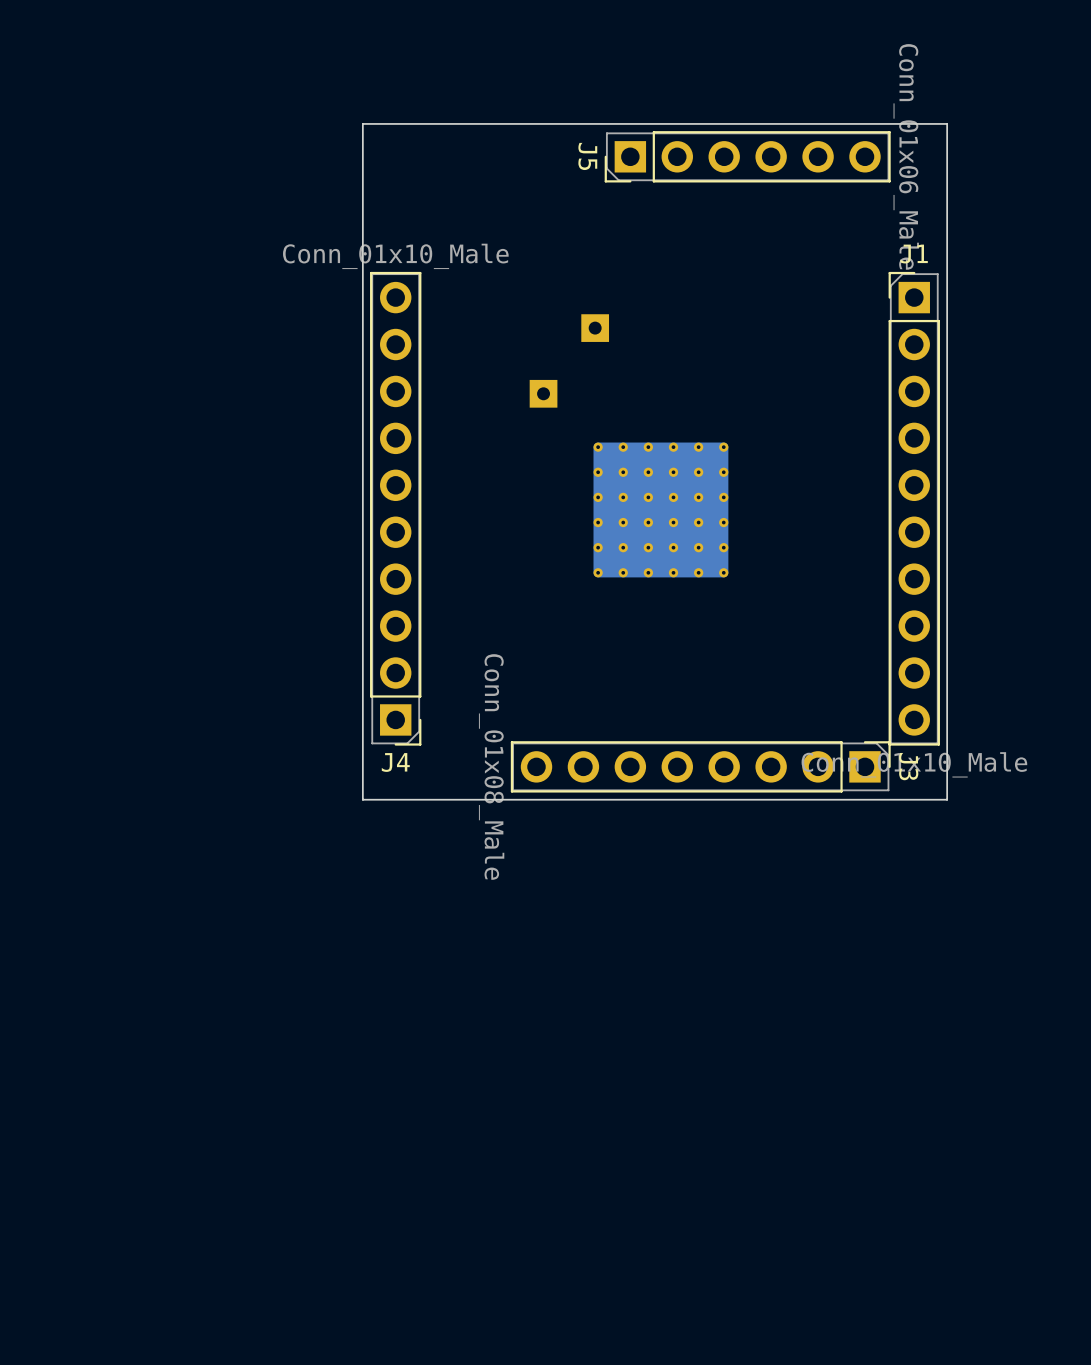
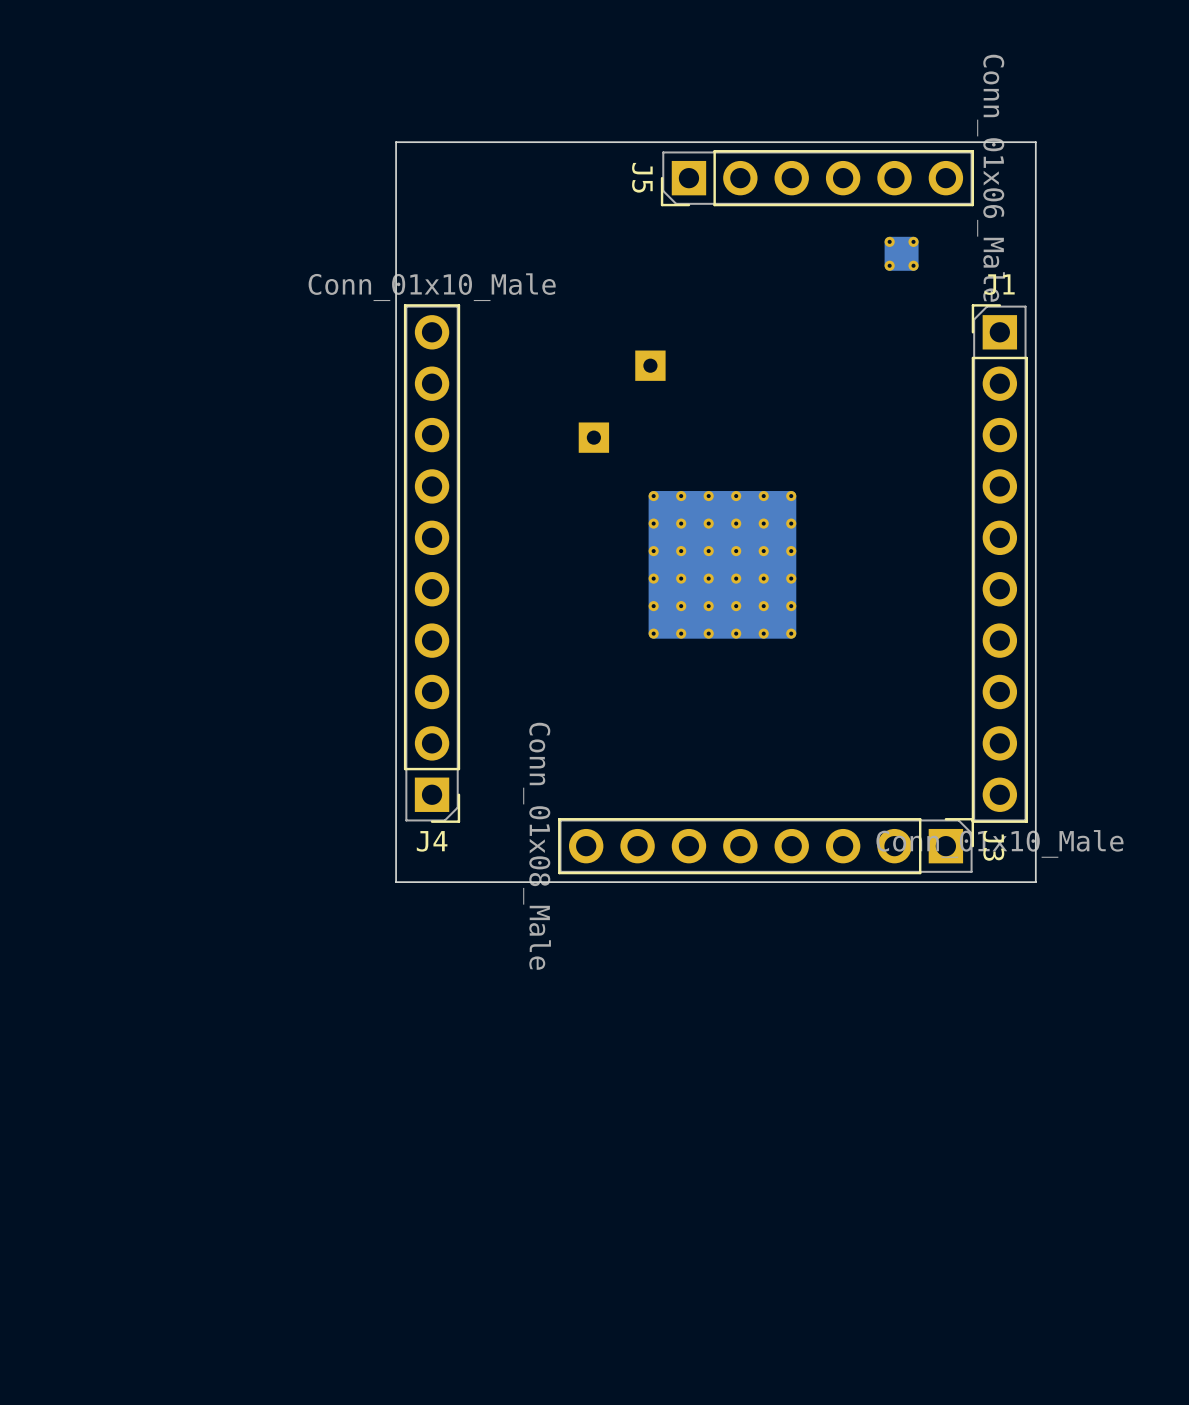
part: none -> (901, 253)

